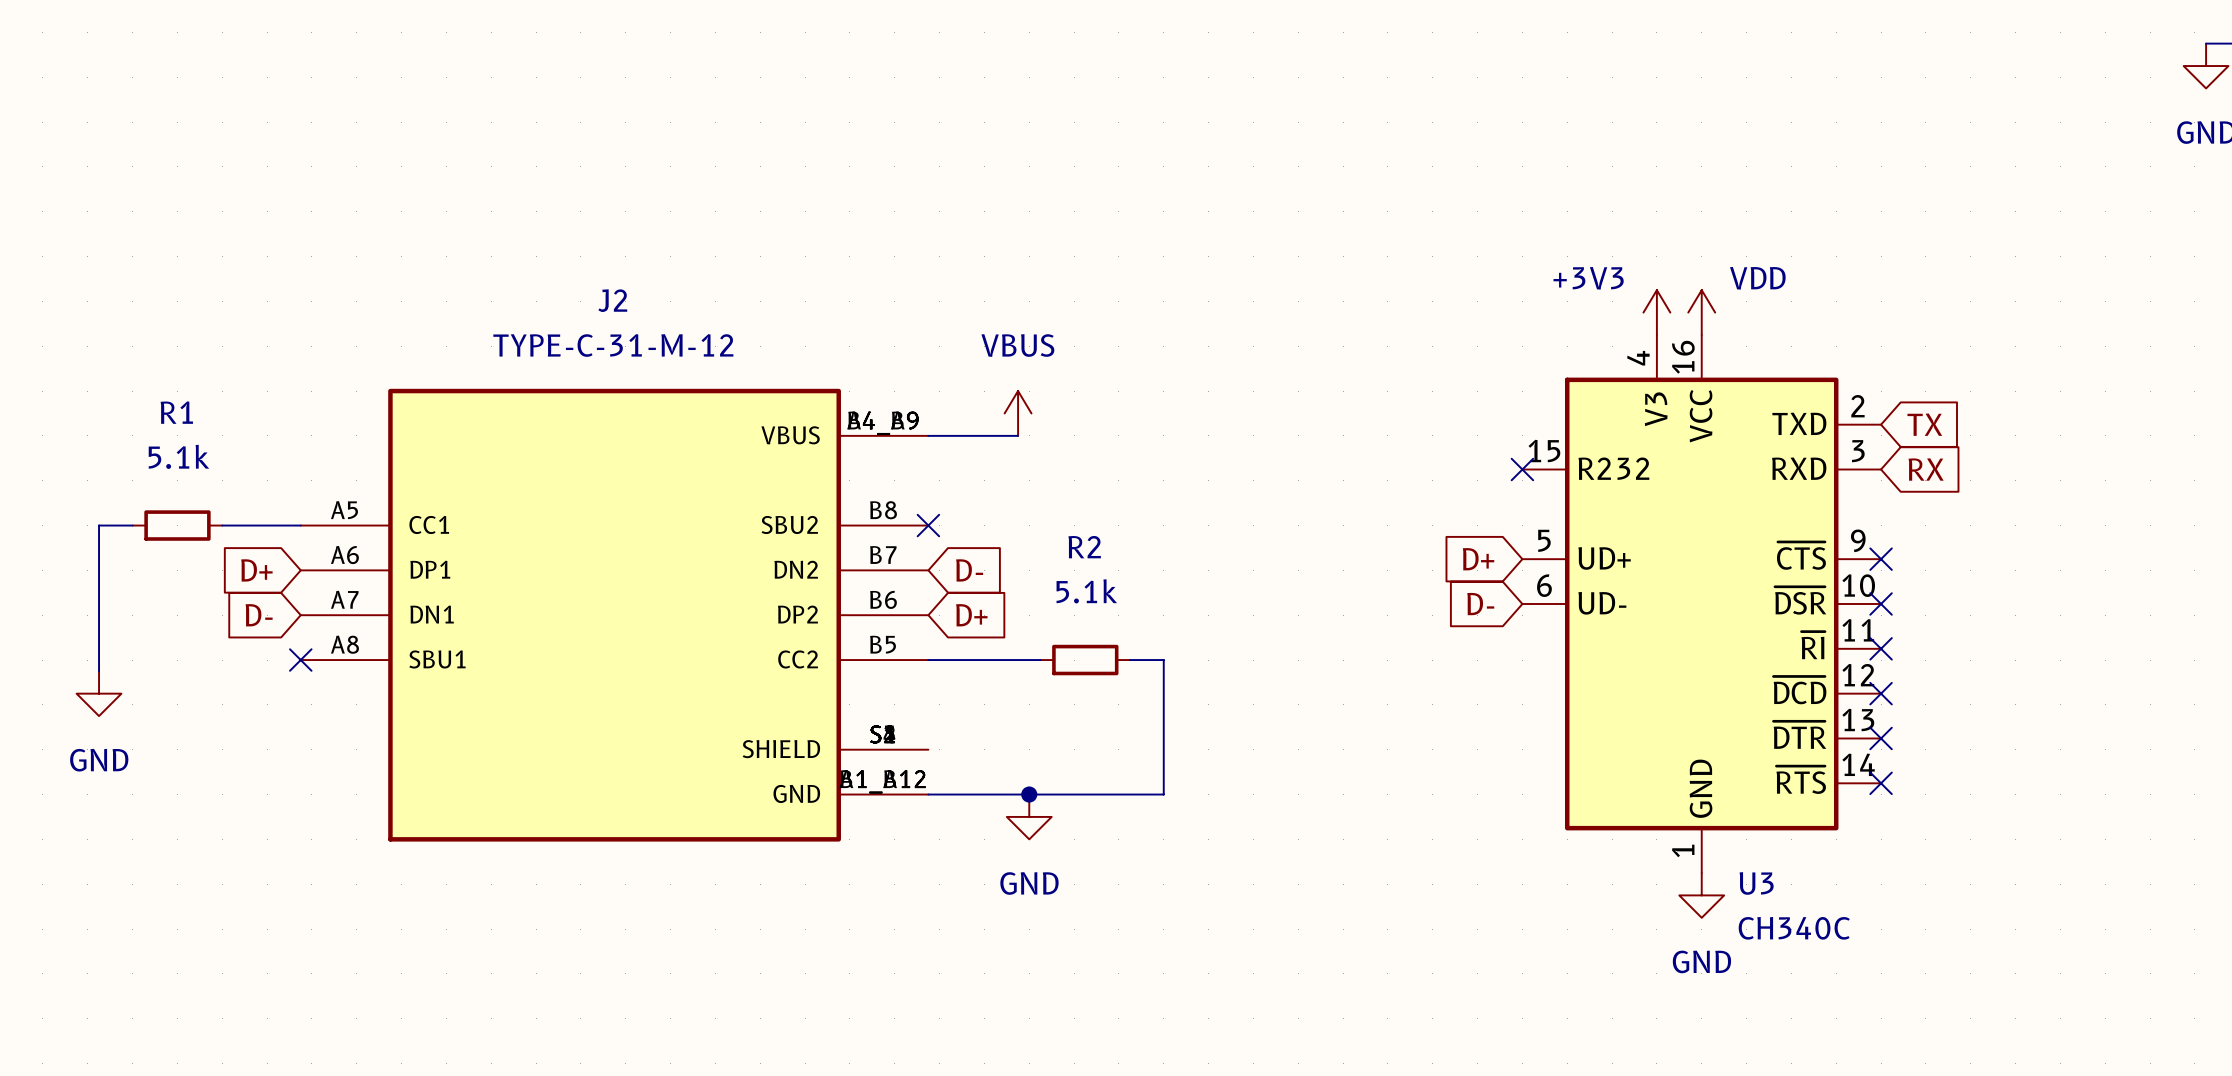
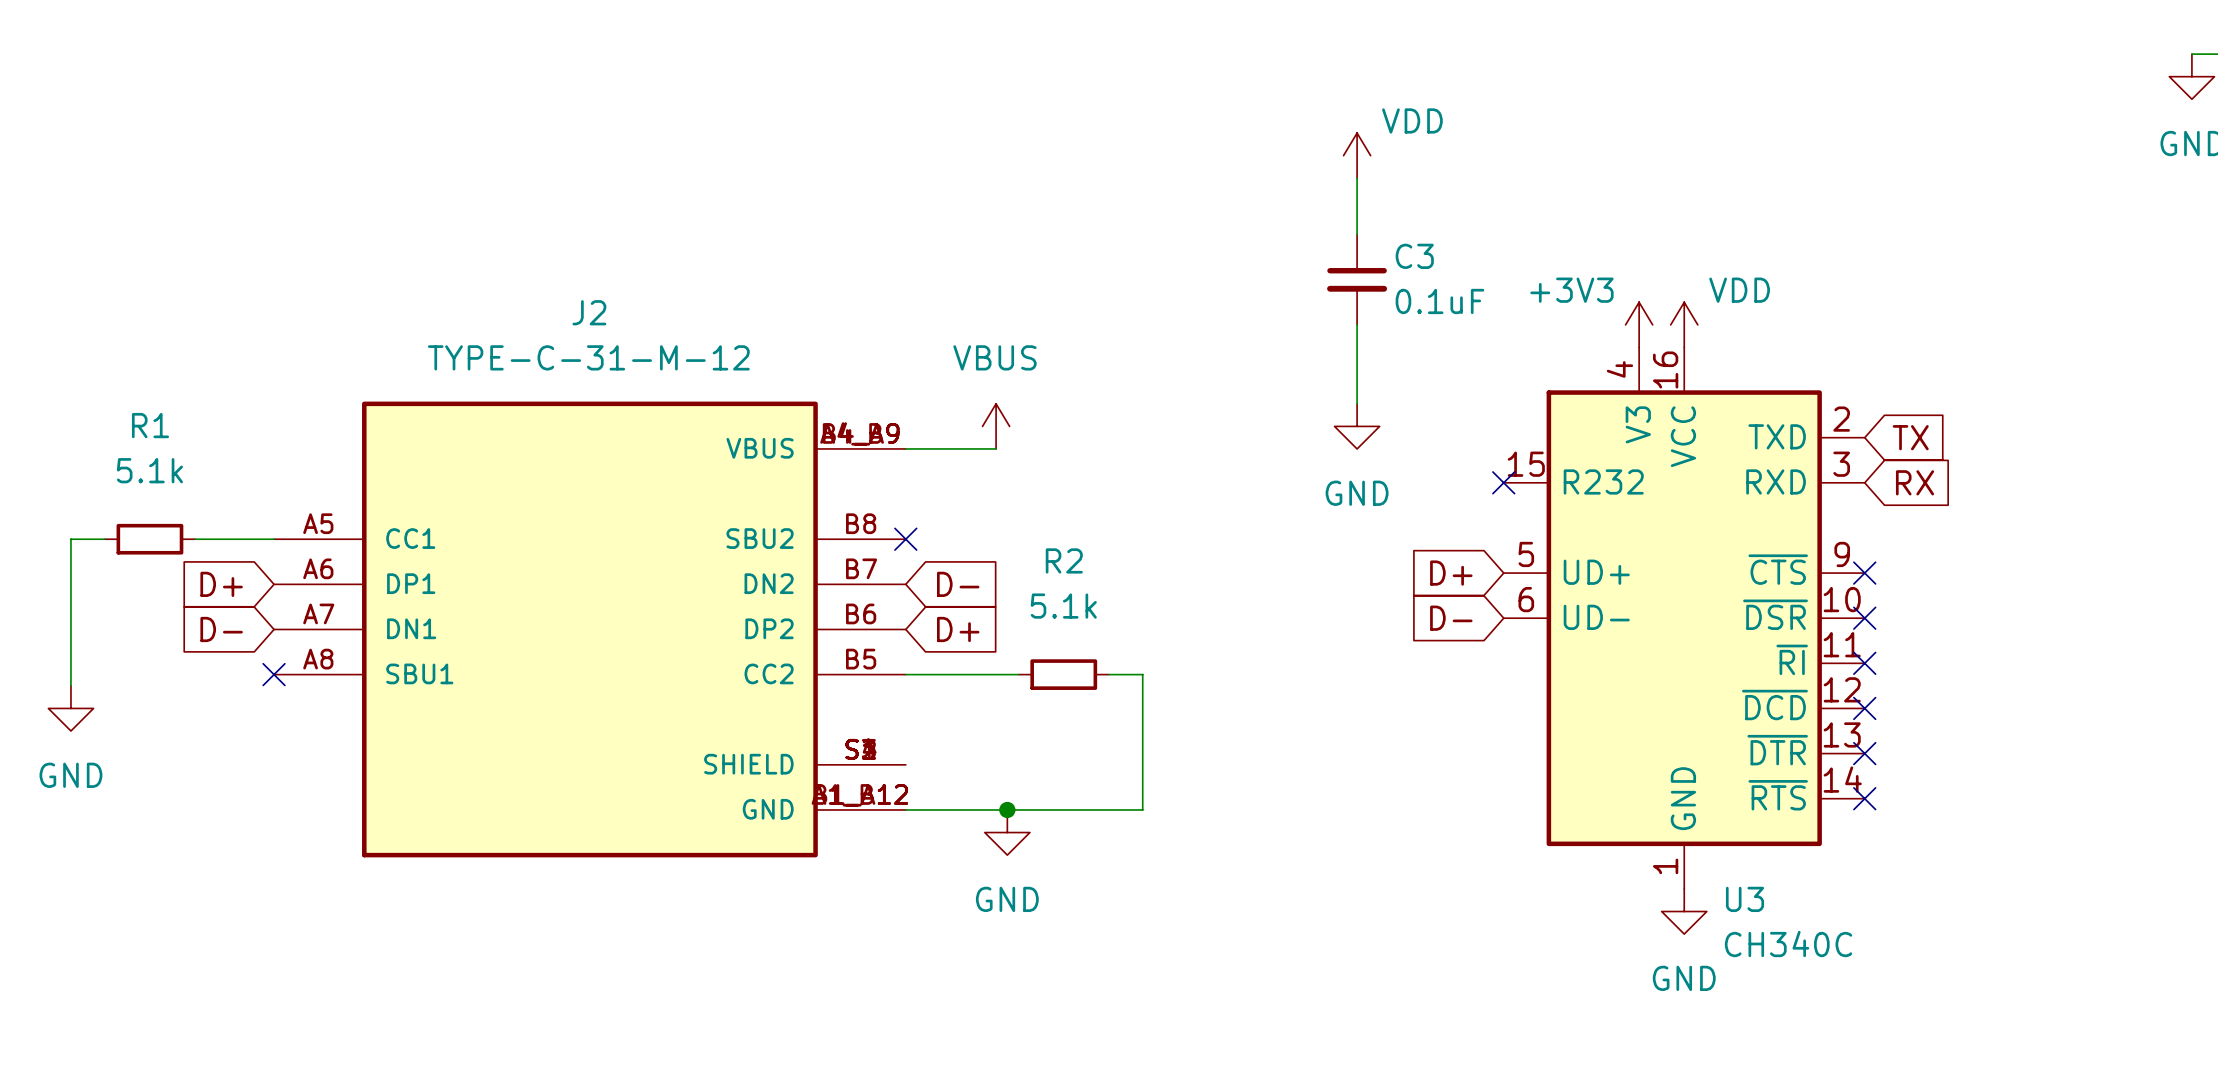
power symbol: none -> VDD (1357, 155)
wire: none -> (1357, 178) (1357, 234)
C3: none -> 0.1uF (1357, 279)
wire: none -> (1357, 324) (1357, 403)
power symbol: none -> GND (1357, 426)

